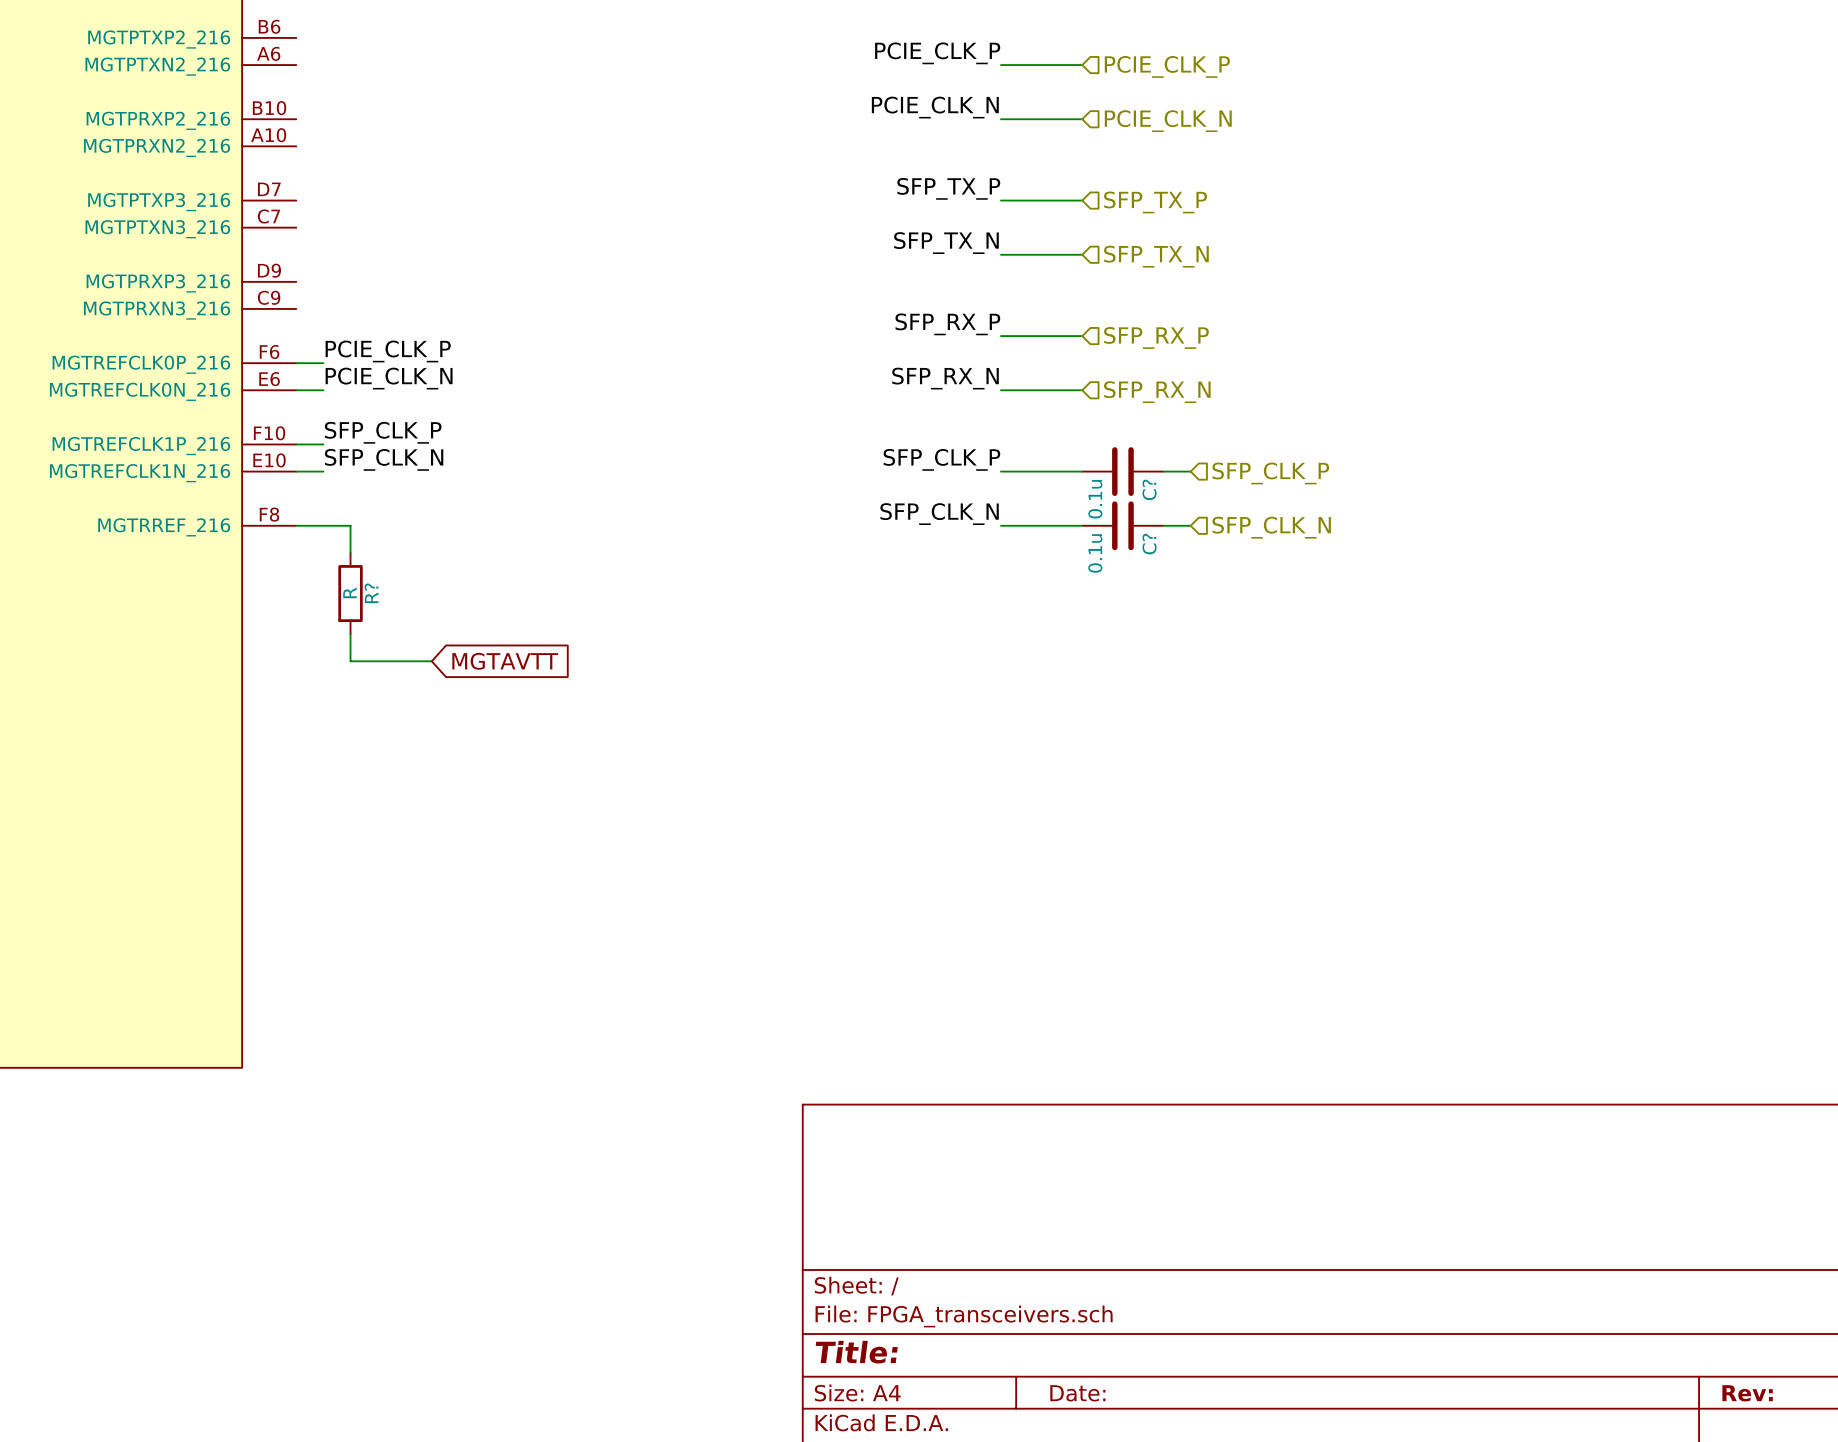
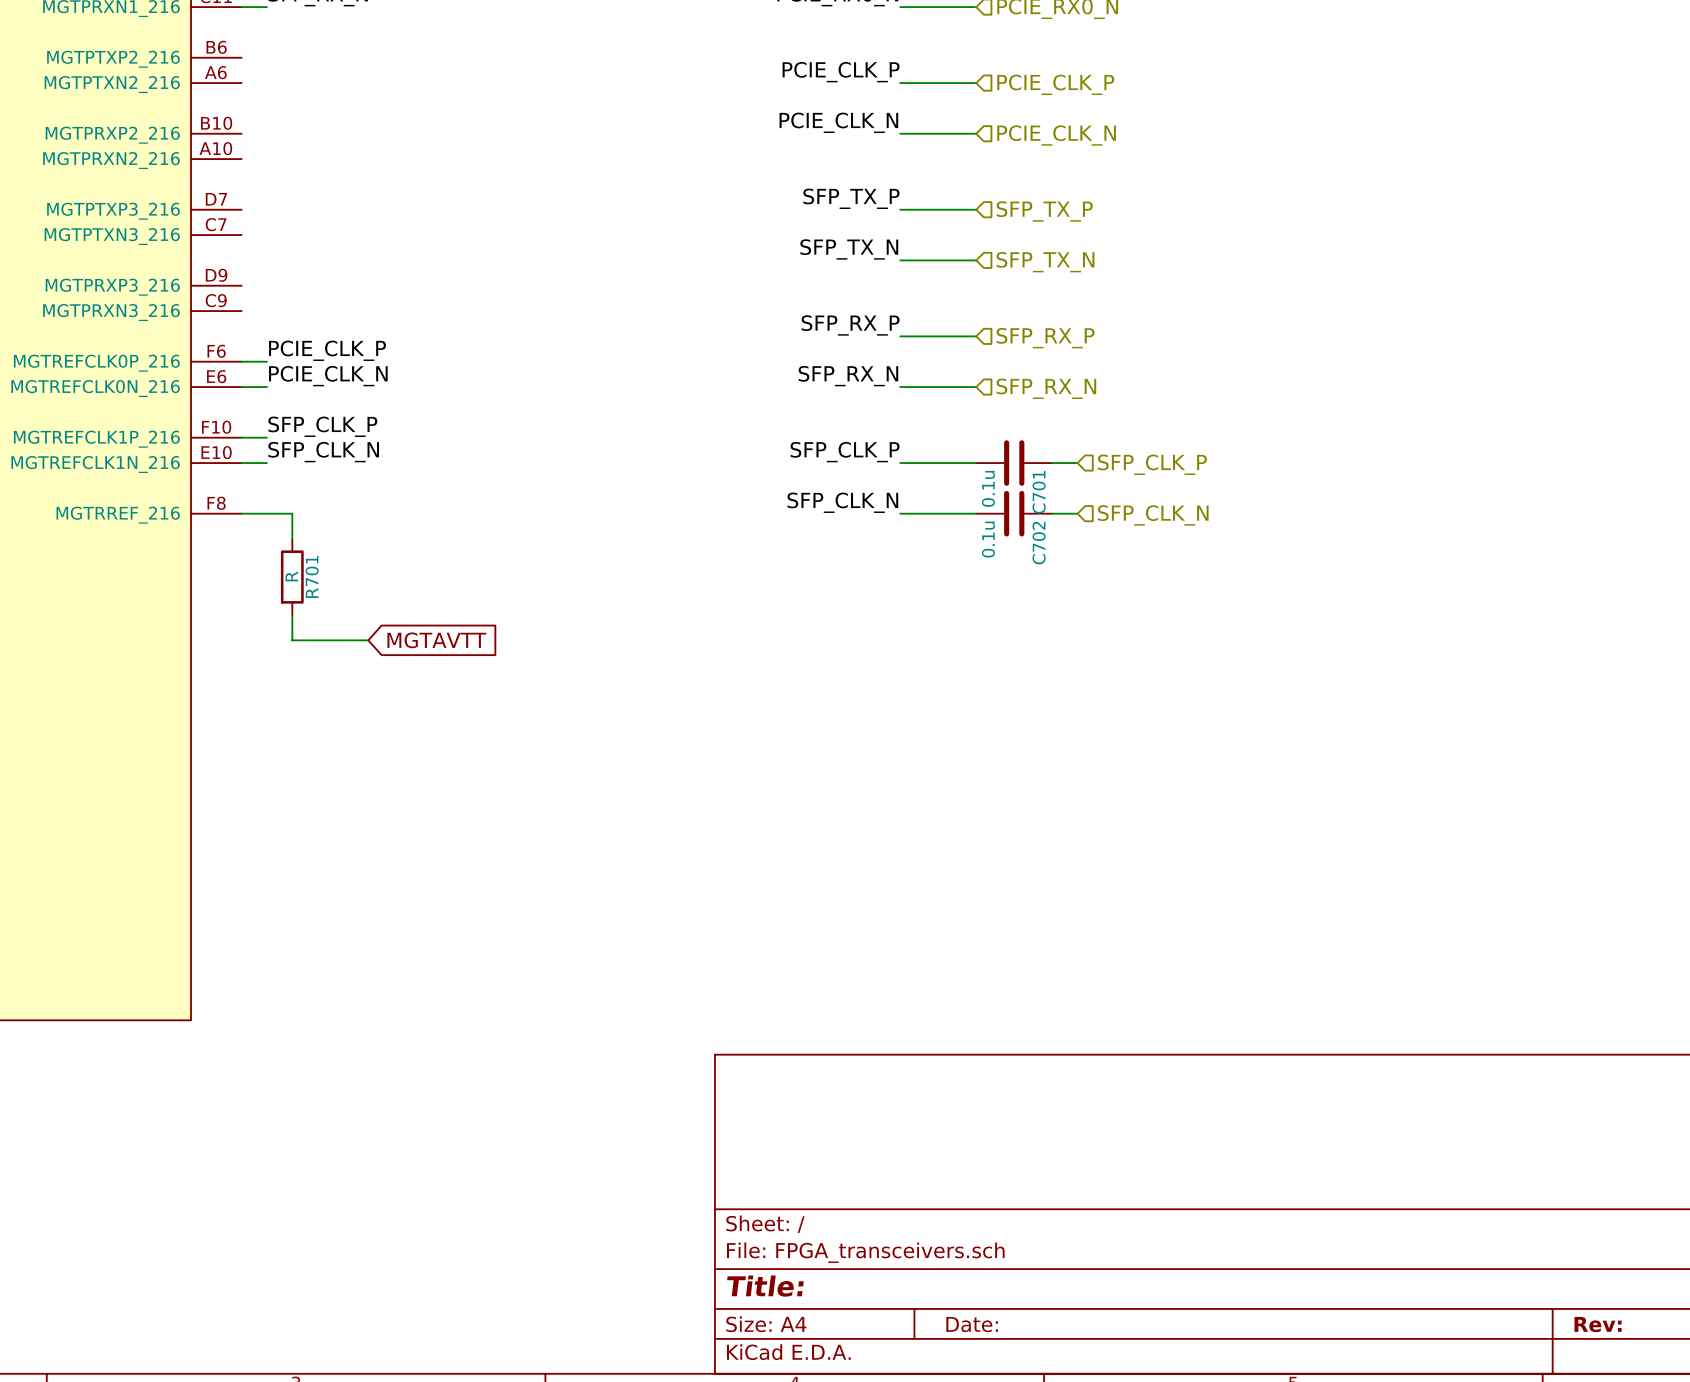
C? name: C? (1149, 489) -> C701 (1039, 492)
C? name: C? (1149, 544) -> C702 (1039, 543)
R? name: R? (371, 593) -> R701 (312, 576)

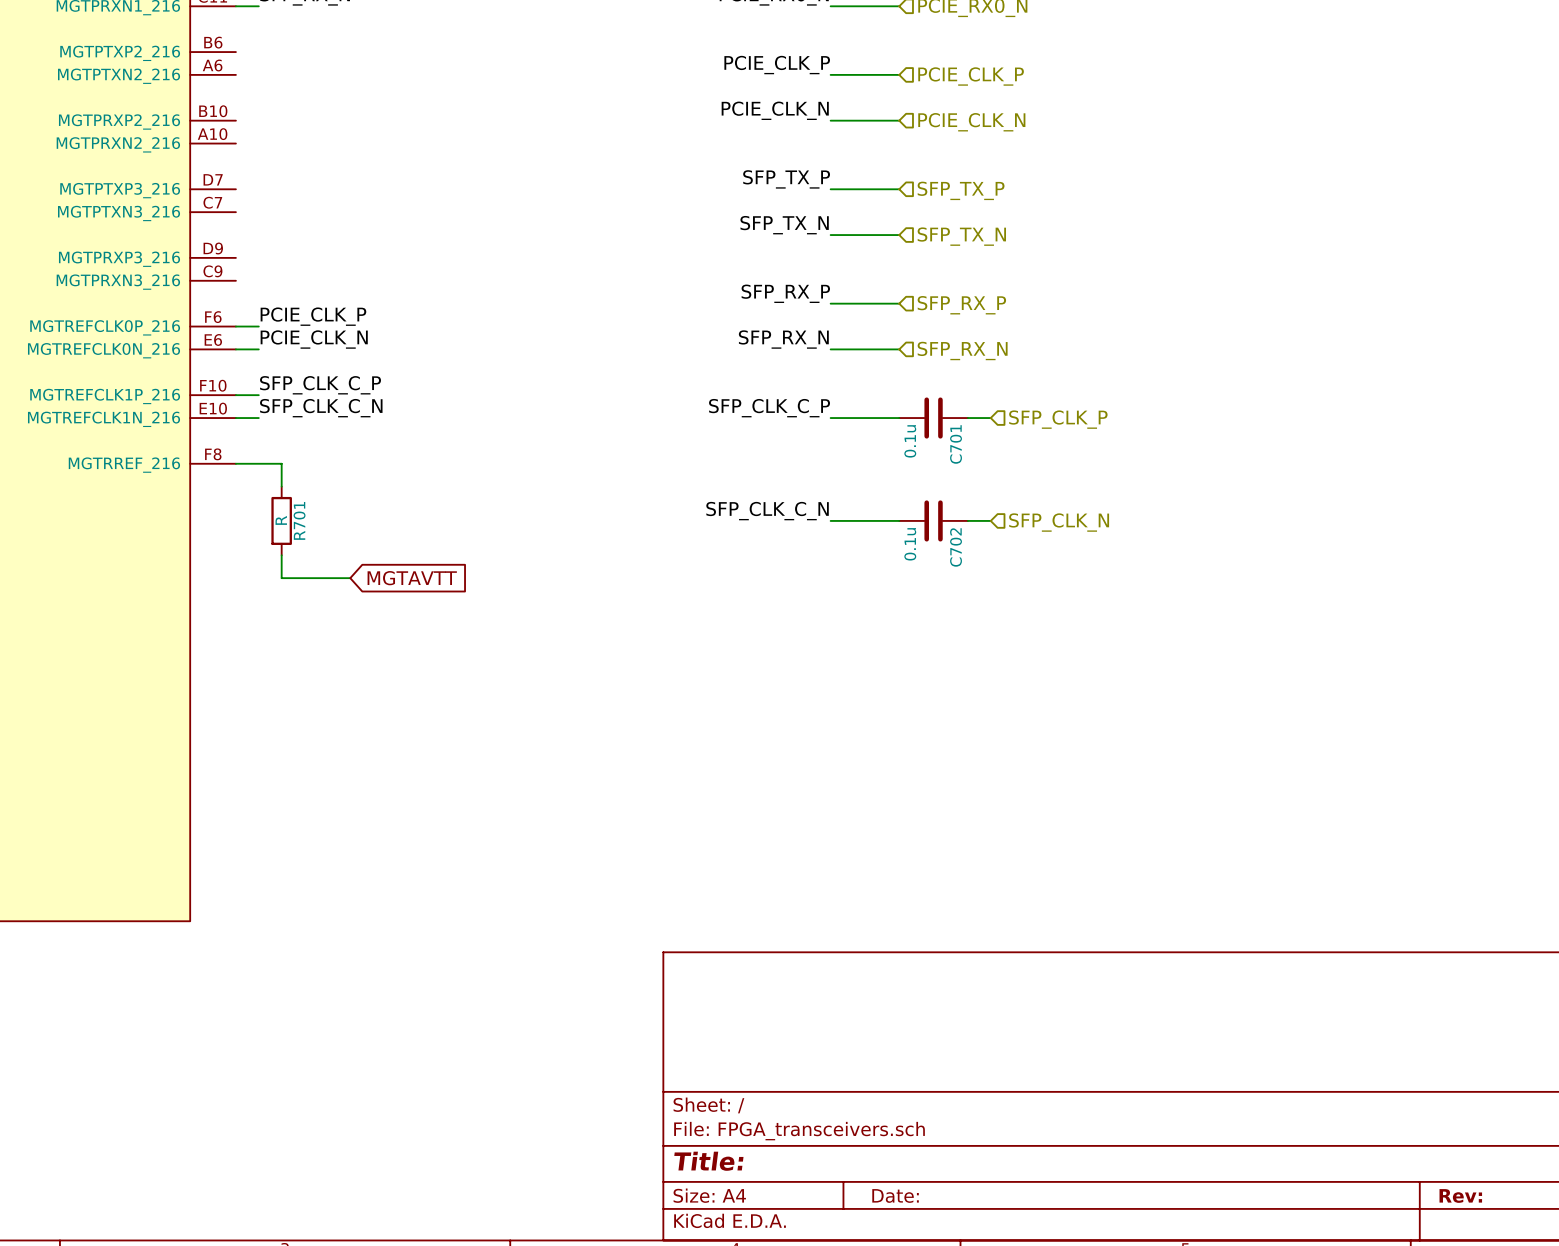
label: SFP_CLK_P (322, 426) -> SFP_CLK_C_P (320, 385)
label: SFP_CLK_N (323, 452) -> SFP_CLK_C_N (321, 408)
label: SFP_CLK_P (845, 452) -> SFP_CLK_C_P (769, 408)
label: SFP_CLK_N (842, 502) -> none
wire: (900, 513) (976, 513) -> (830, 520) (899, 520)
C702 position: (1014, 513) -> (933, 520)
wire: (1052, 513) (1077, 513) -> (967, 520) (990, 520)
hierarchical label position: SFP_CLK_N (1153, 515) -> SFP_CLK_N (1059, 522)
label: none -> SFP_CLK_C_N (767, 511)

